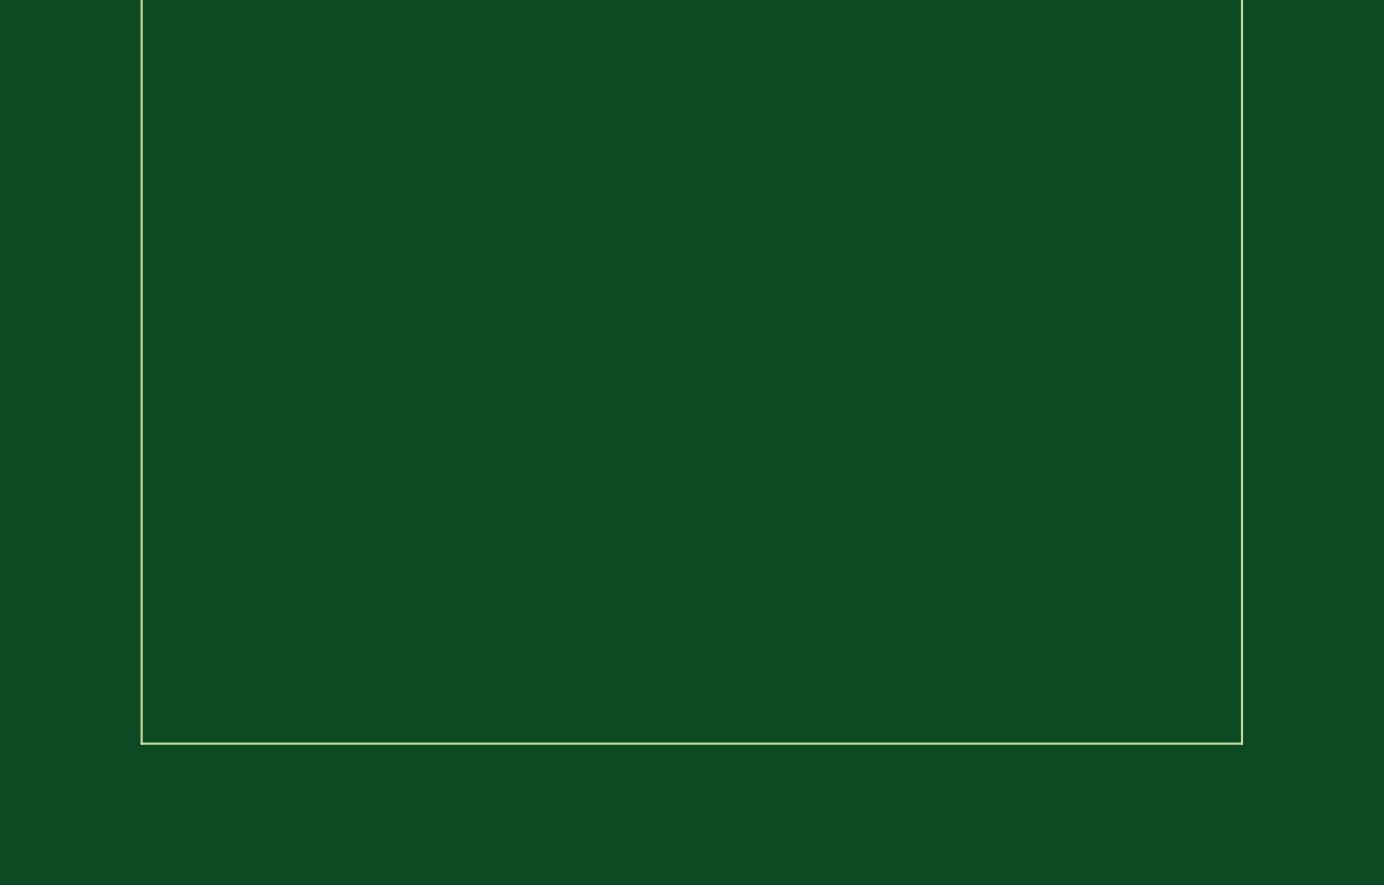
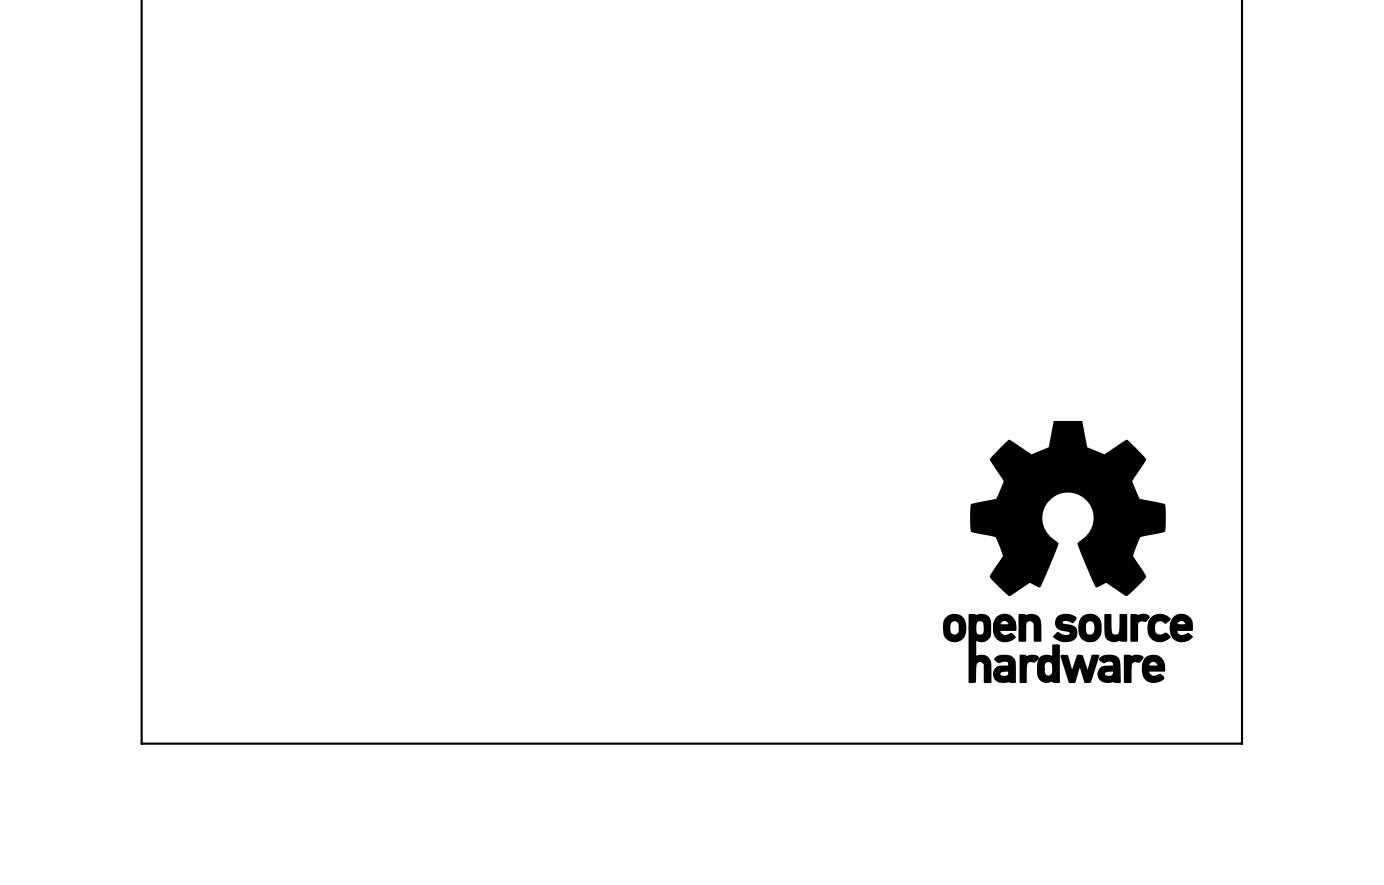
drawing: none -> [943, 420, 1193, 684]

